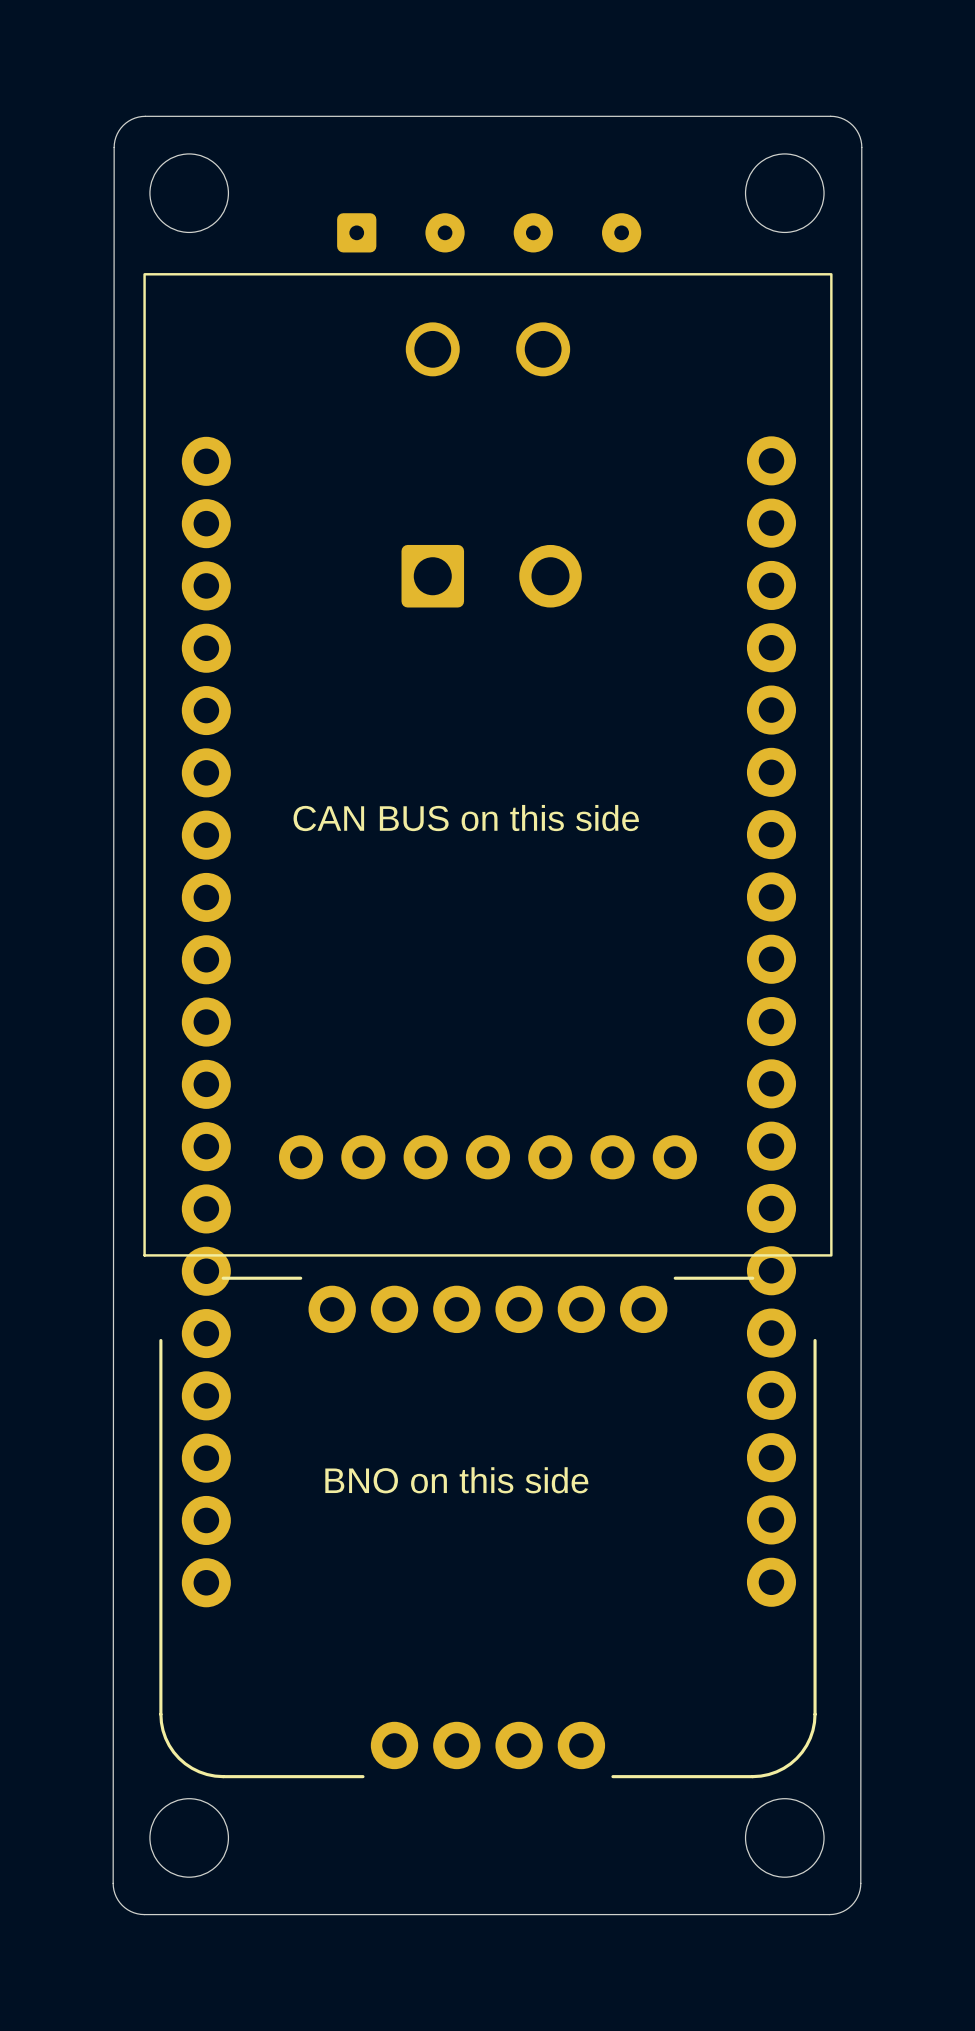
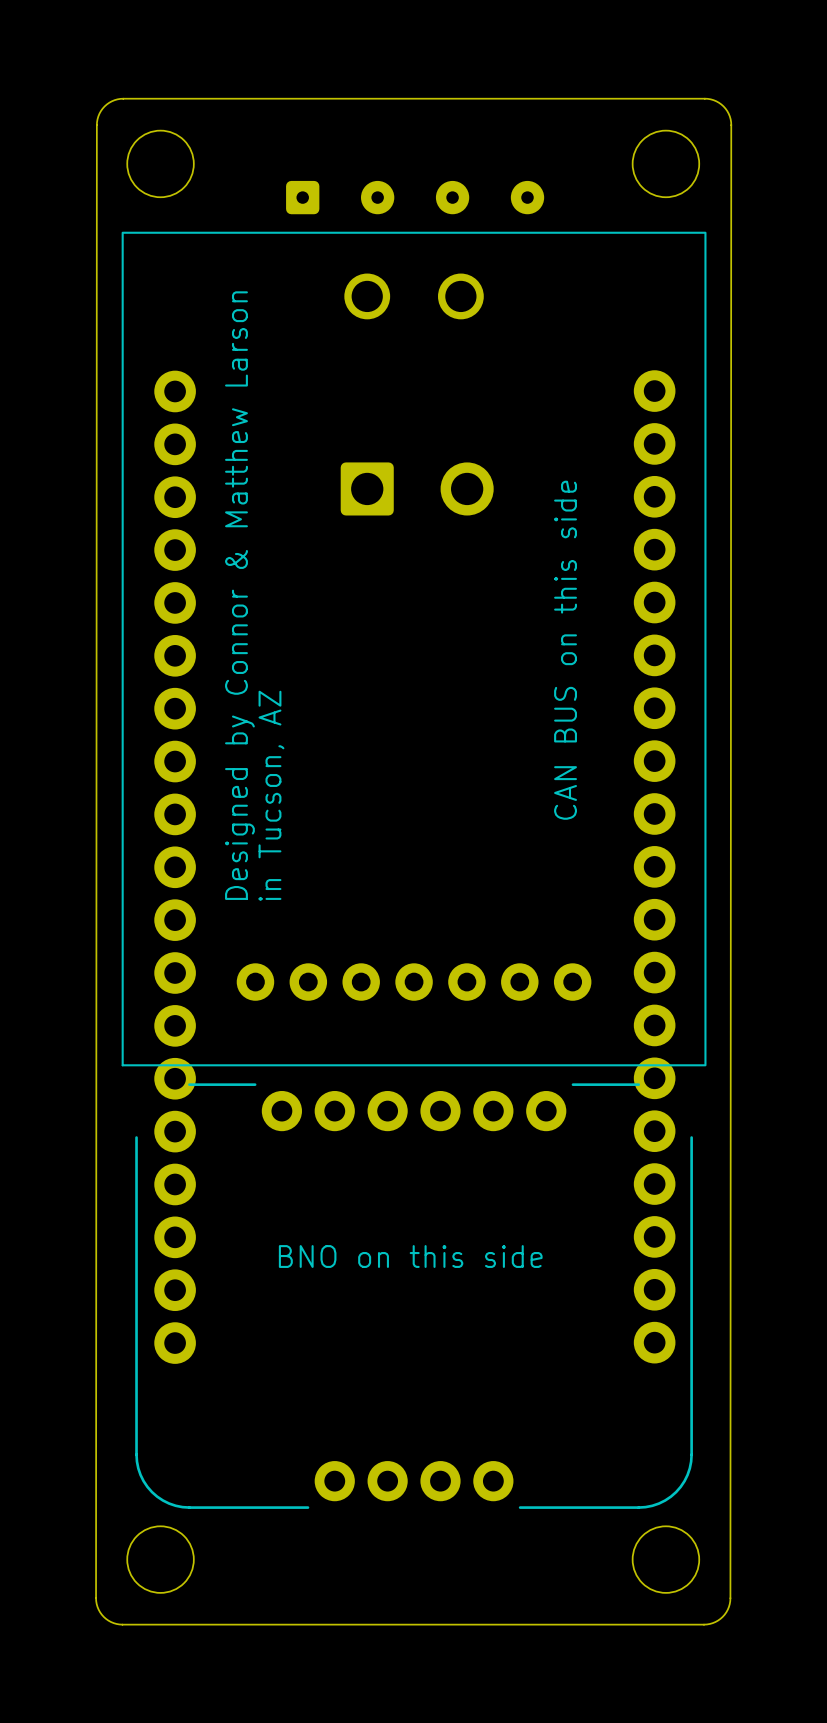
text: none -> Designed by Connor & Matthew Larson (239, 595)
text rotation: 0° (466, 818) -> 90° counterclockwise (565, 650)
text: none -> in Tucson, AZ (271, 795)

